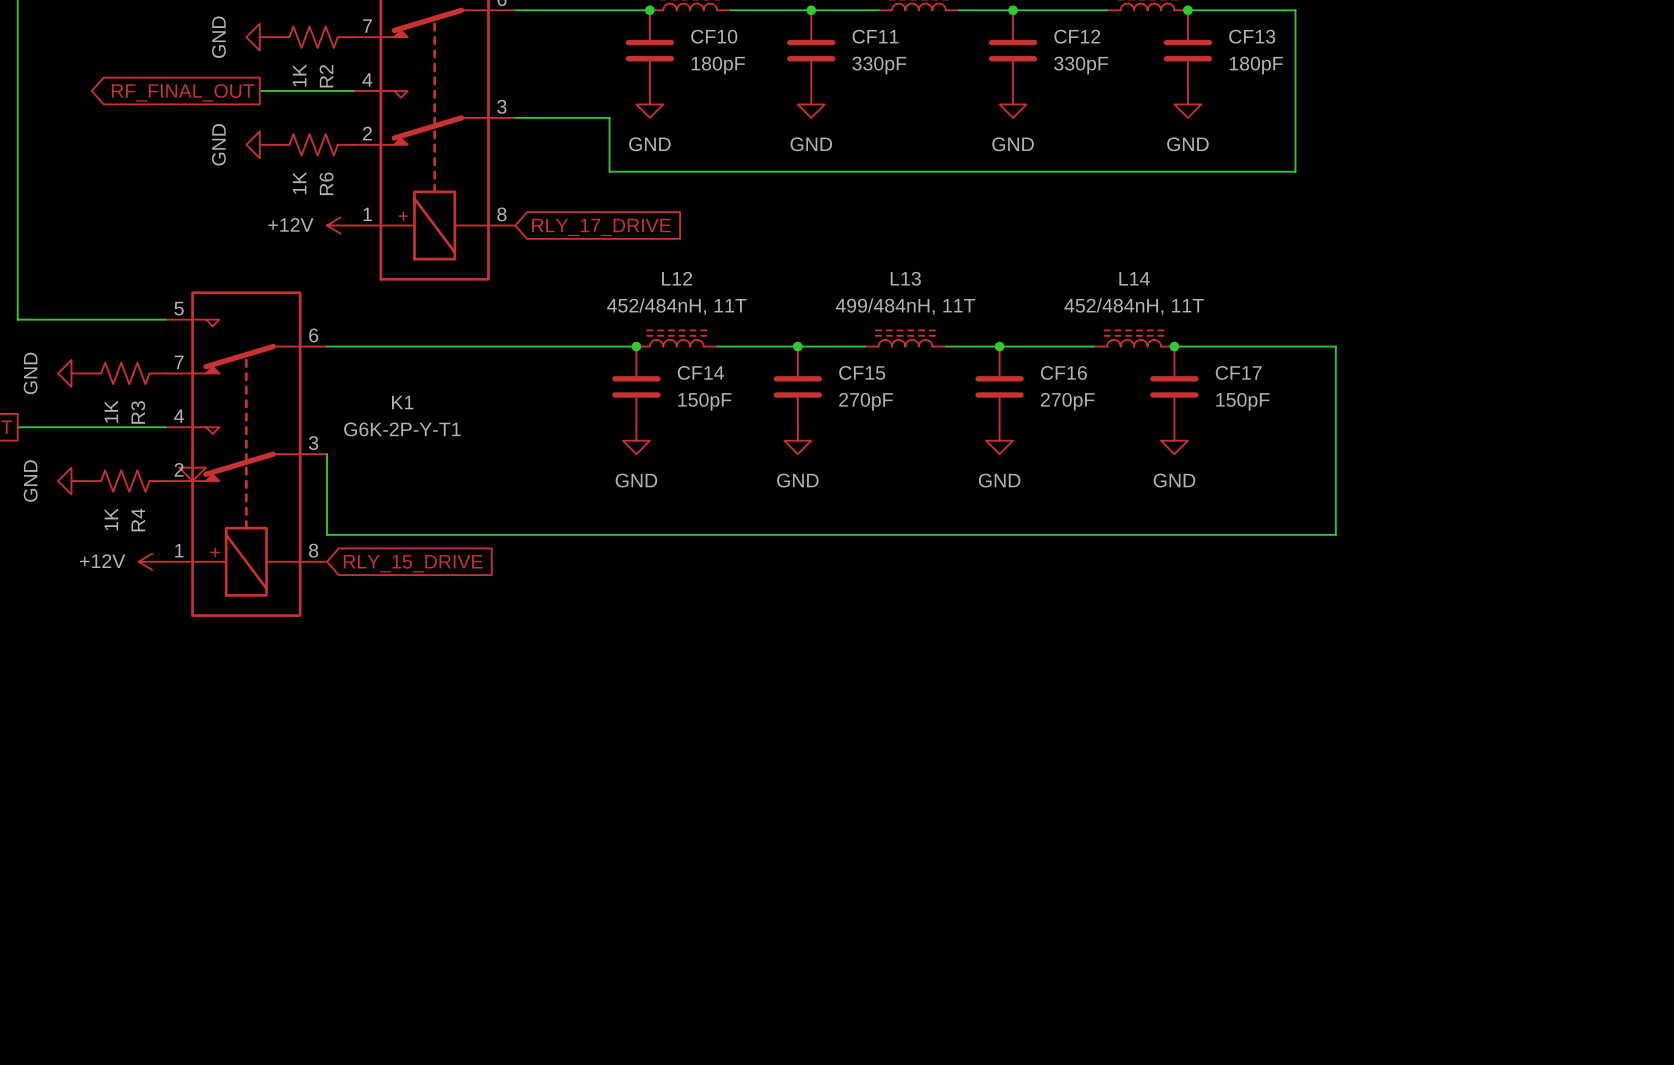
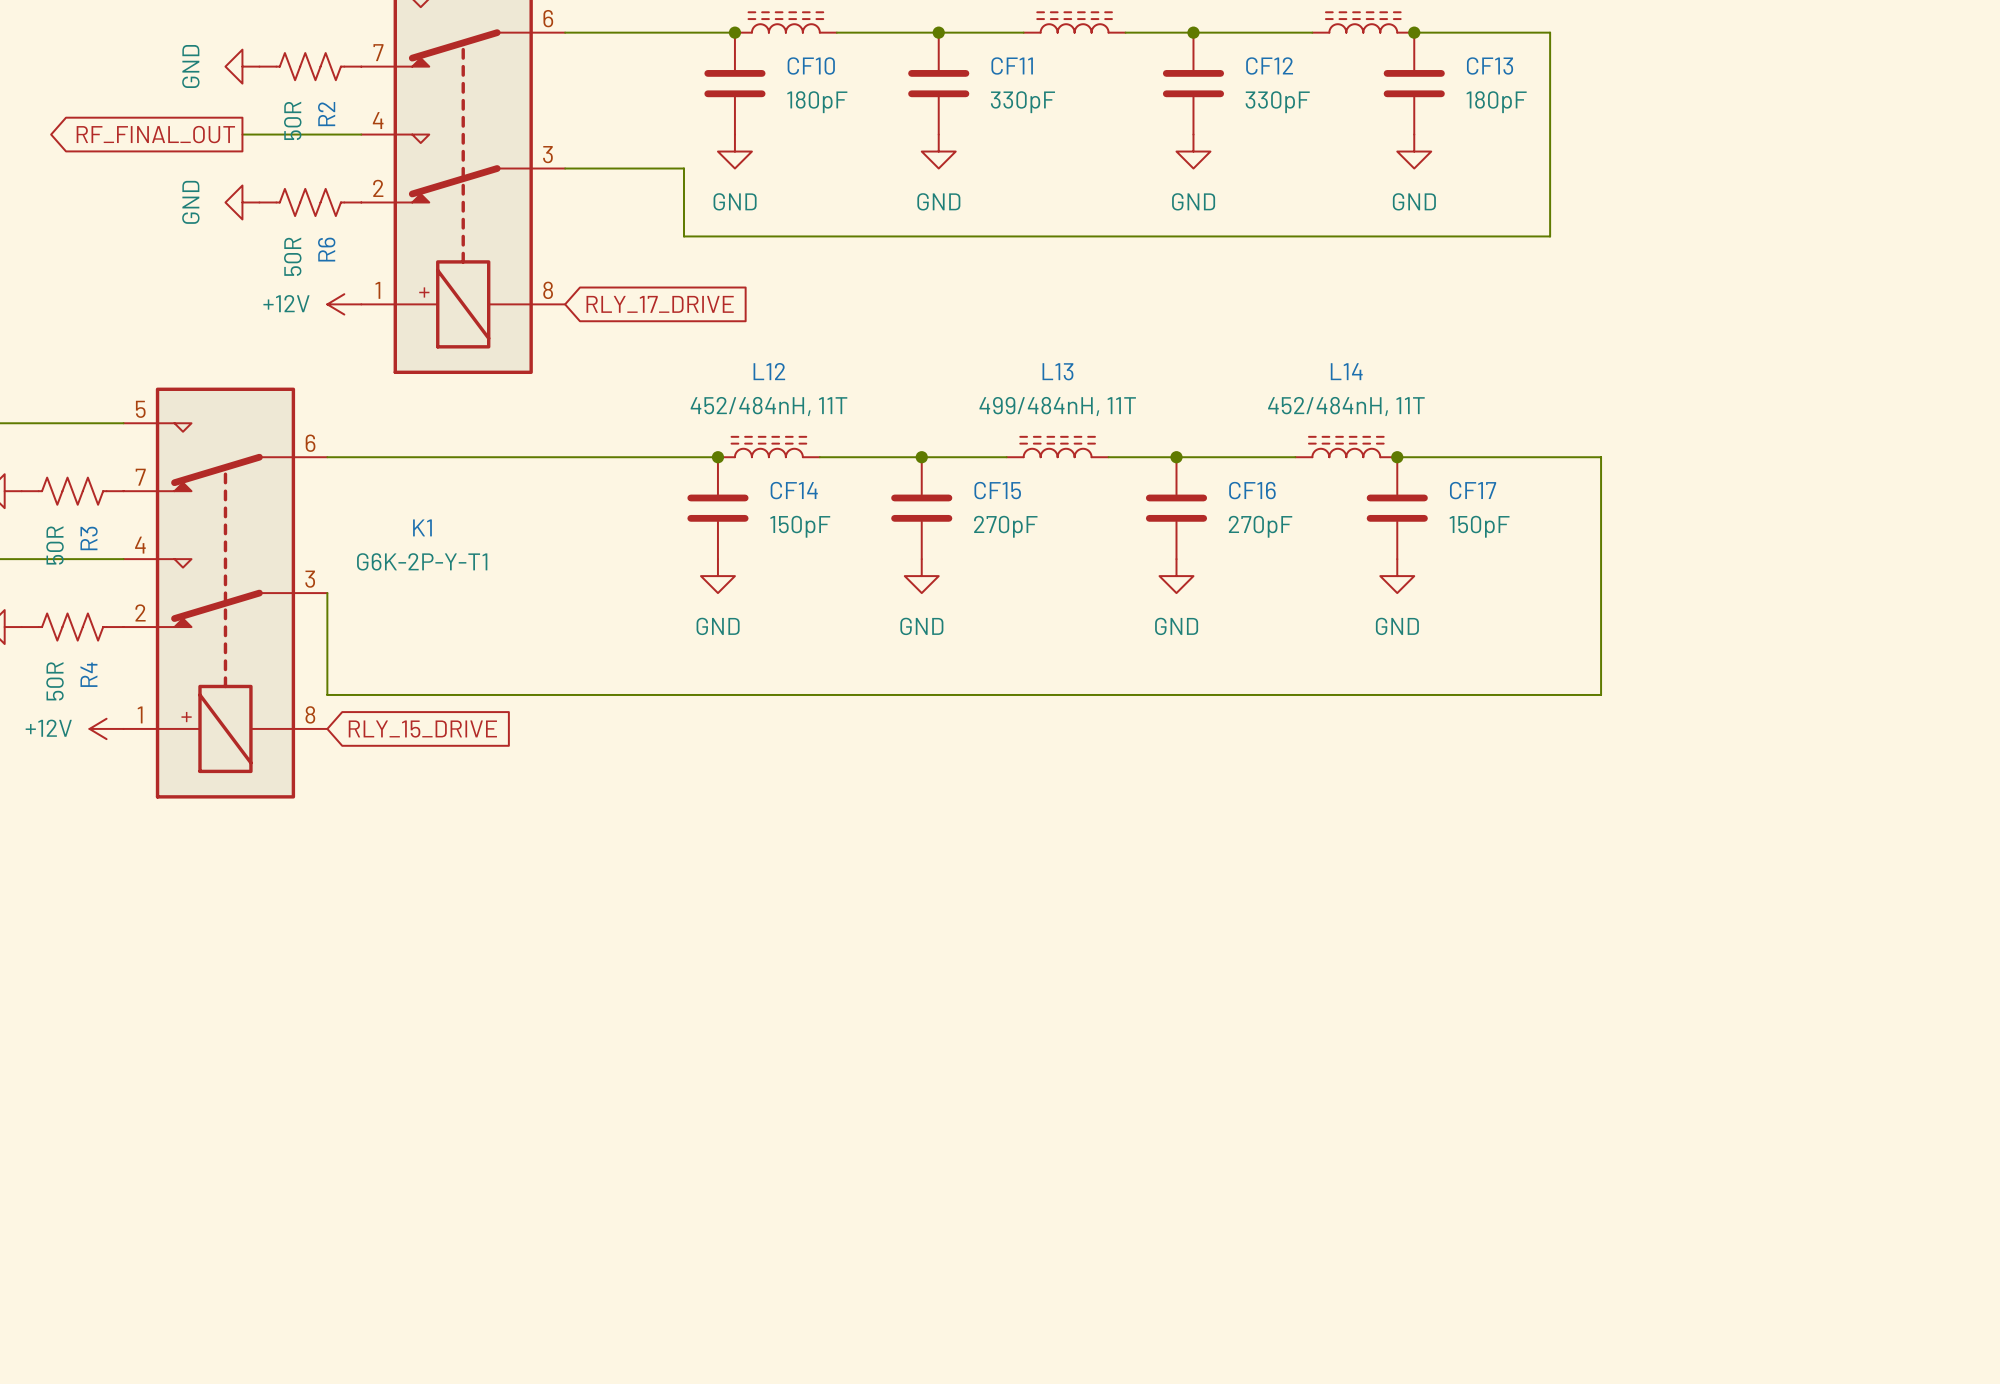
R2 value: 1K (299, 75) -> 50R (292, 120)
R6 value: 1K (299, 183) -> 50R (292, 256)
R3 value: 1K (111, 411) -> 50R (55, 545)
power symbol: (192, 467) -> none
R4 value: 1K (111, 519) -> 50R (55, 681)

